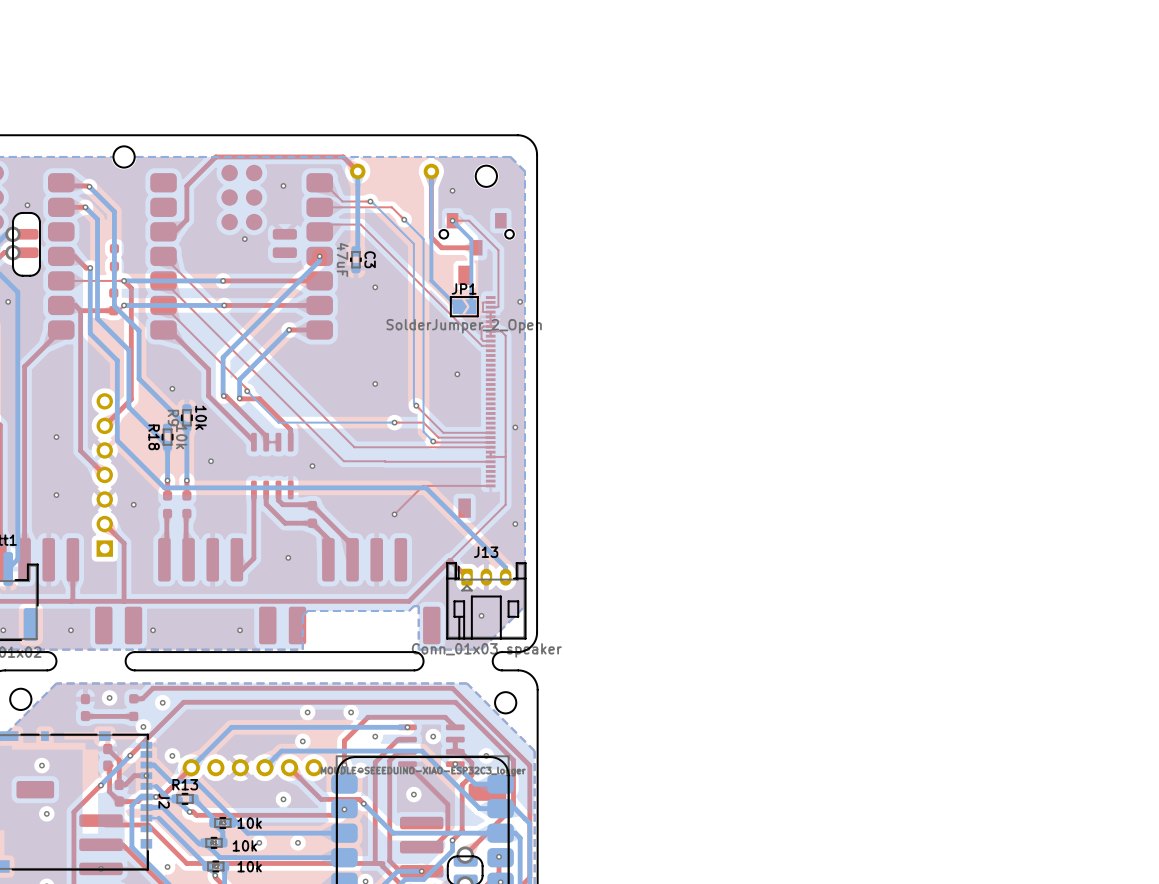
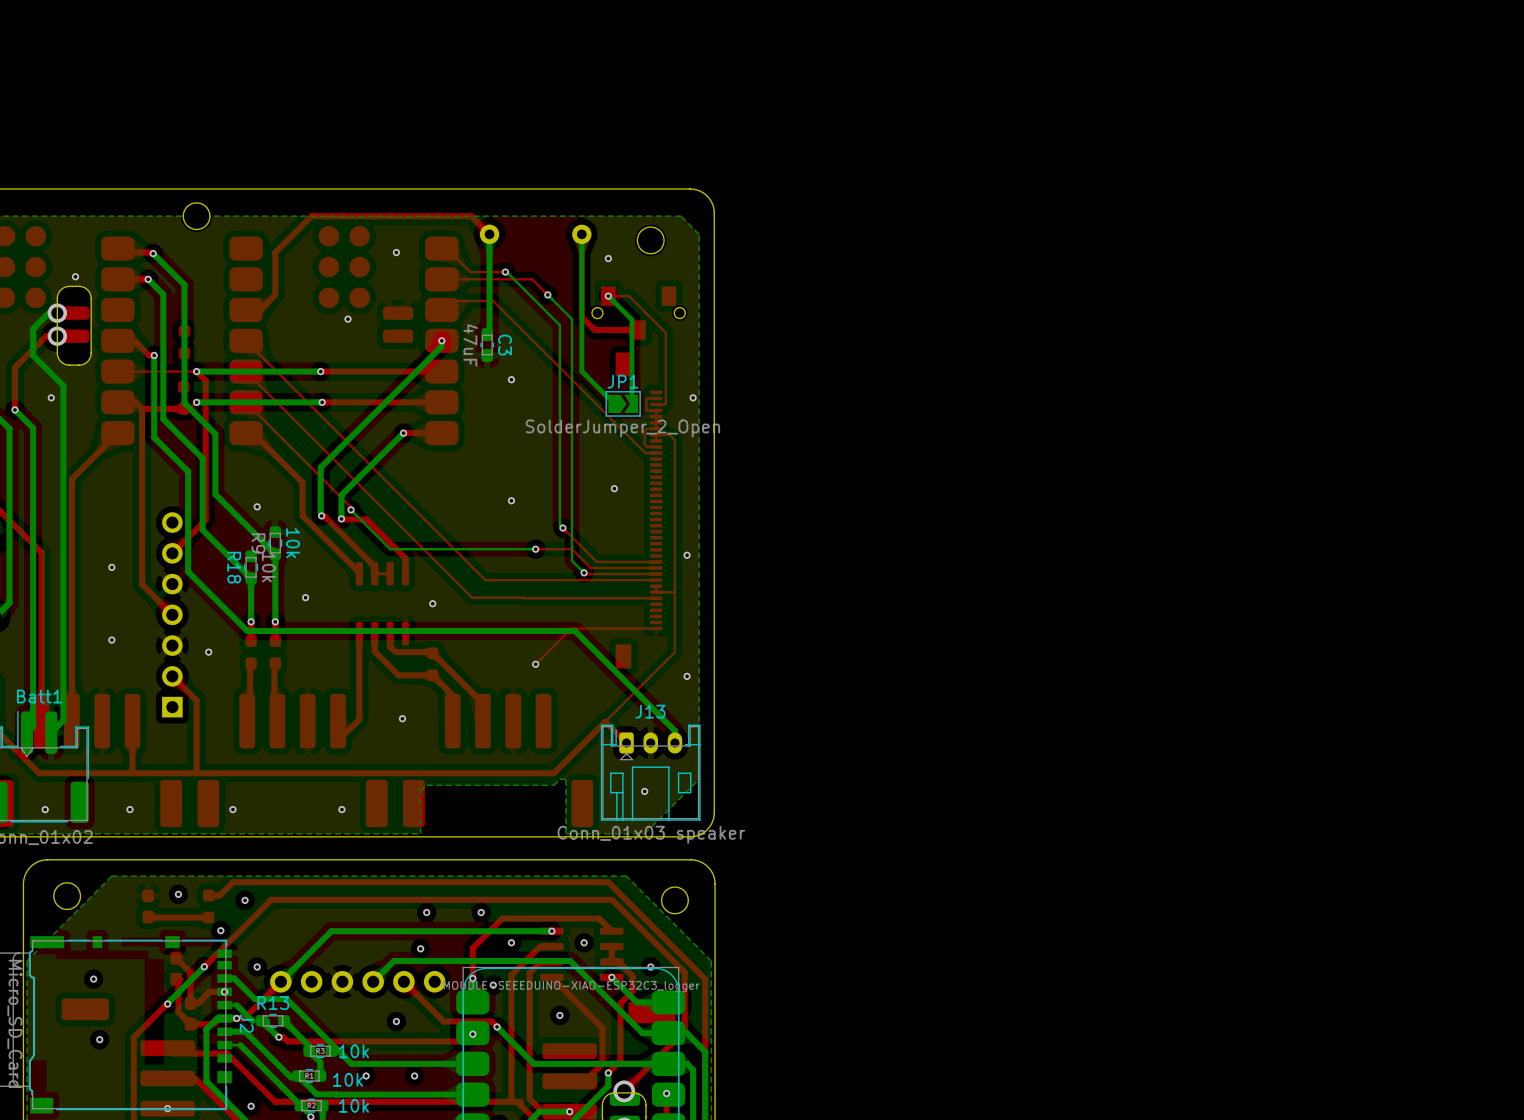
board edge: (47, 652) (53, 654) (56, 661) (53, 667) (47, 670) -> (100, 836) (210, 836)
board edge: (134, 652) (128, 654) (125, 661) (128, 667) (134, 670) -> (100, 859) (210, 859)
board edge: (414, 652) (420, 654) (423, 661) (420, 667) (414, 670) -> (560, 836) (670, 836)
board edge: (501, 652) (495, 654) (492, 661) (495, 668) (502, 670) -> (560, 859) (670, 859)

